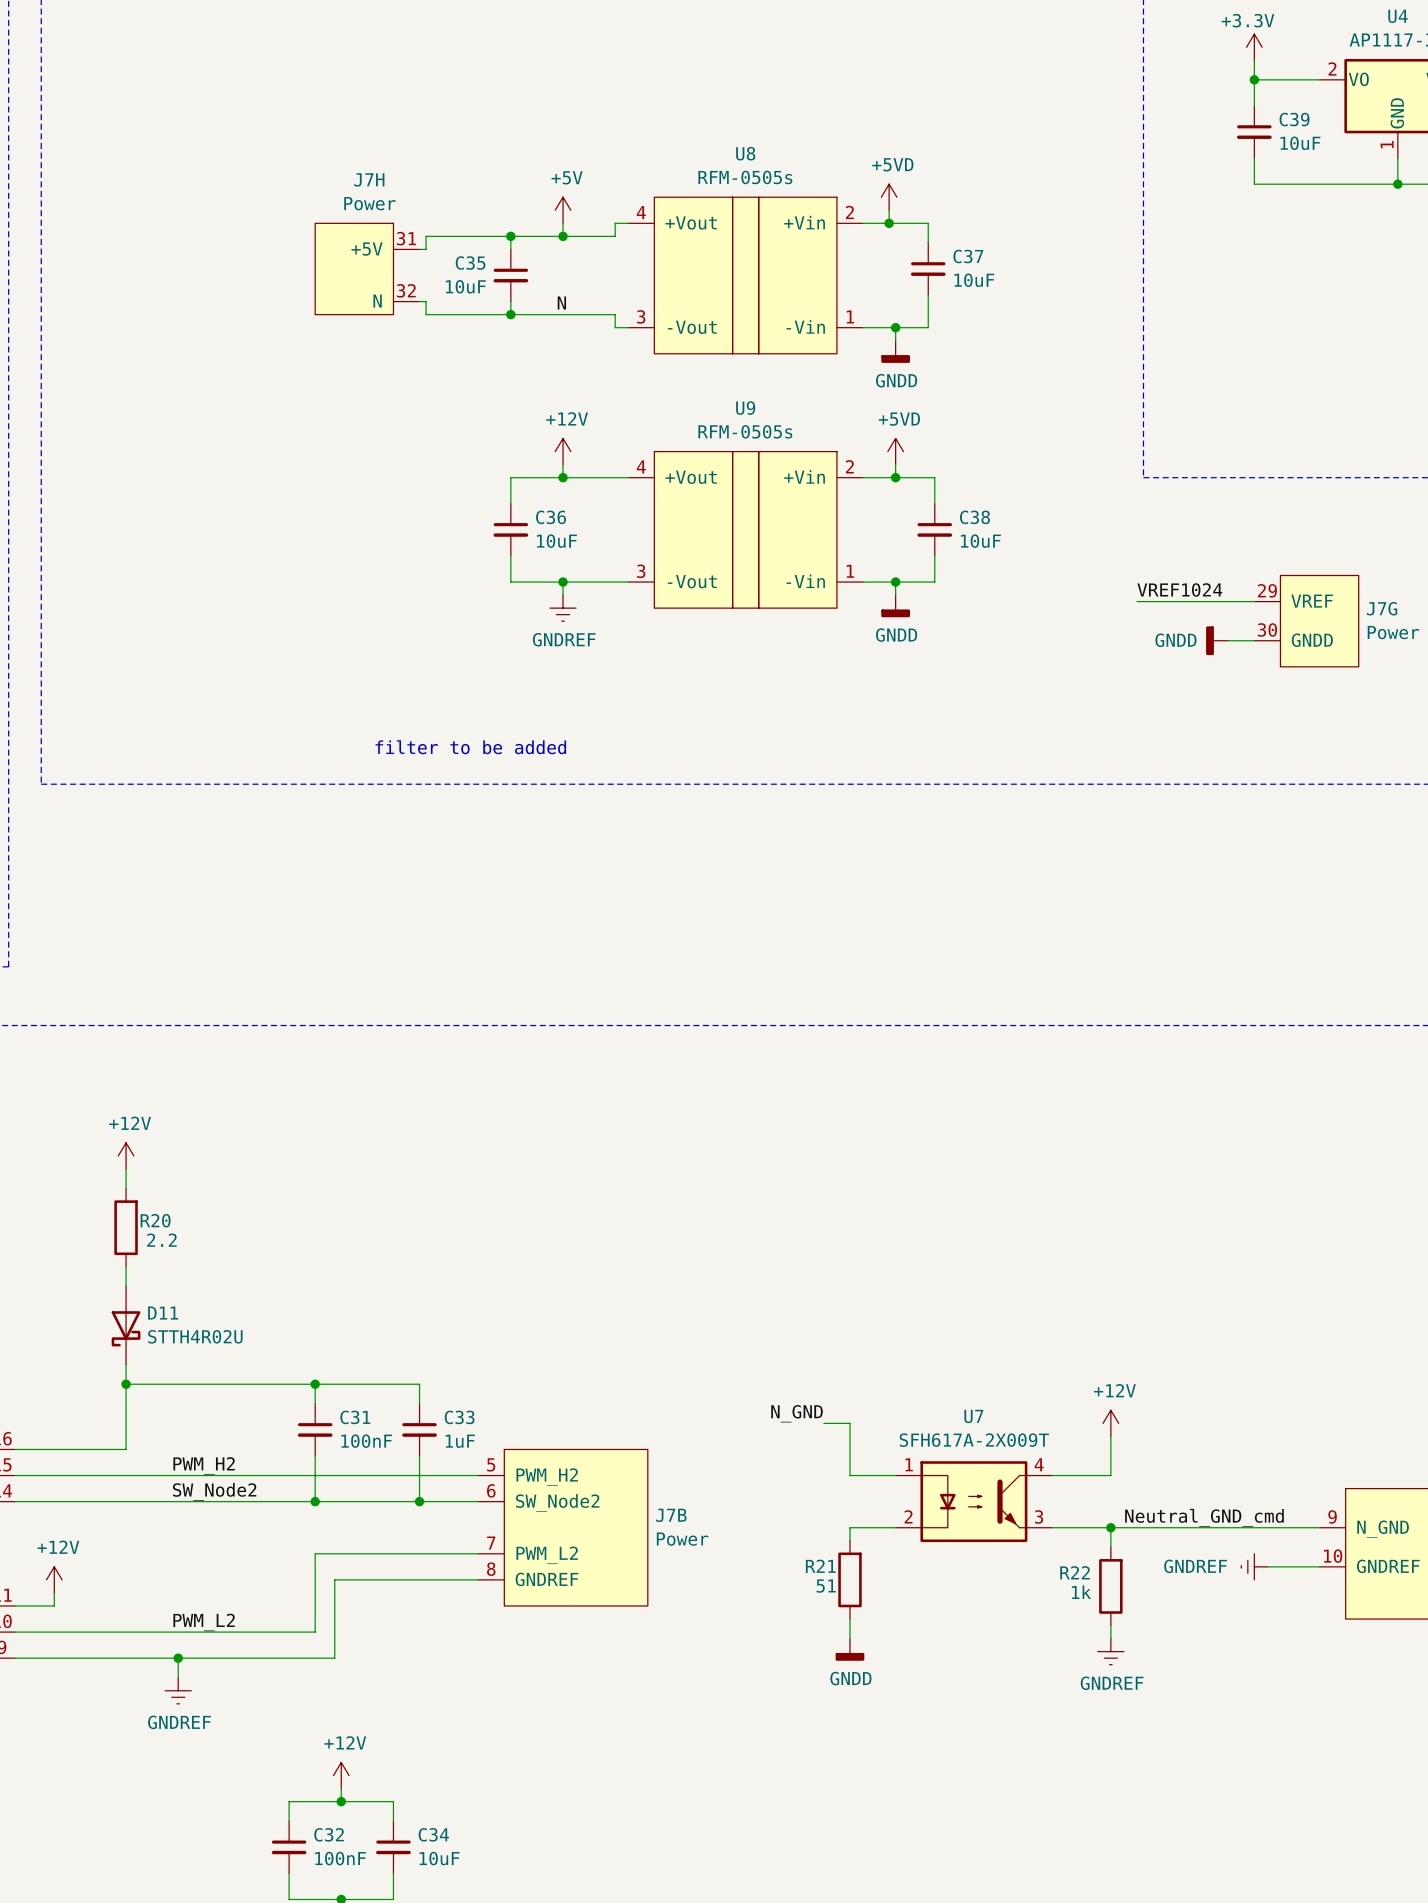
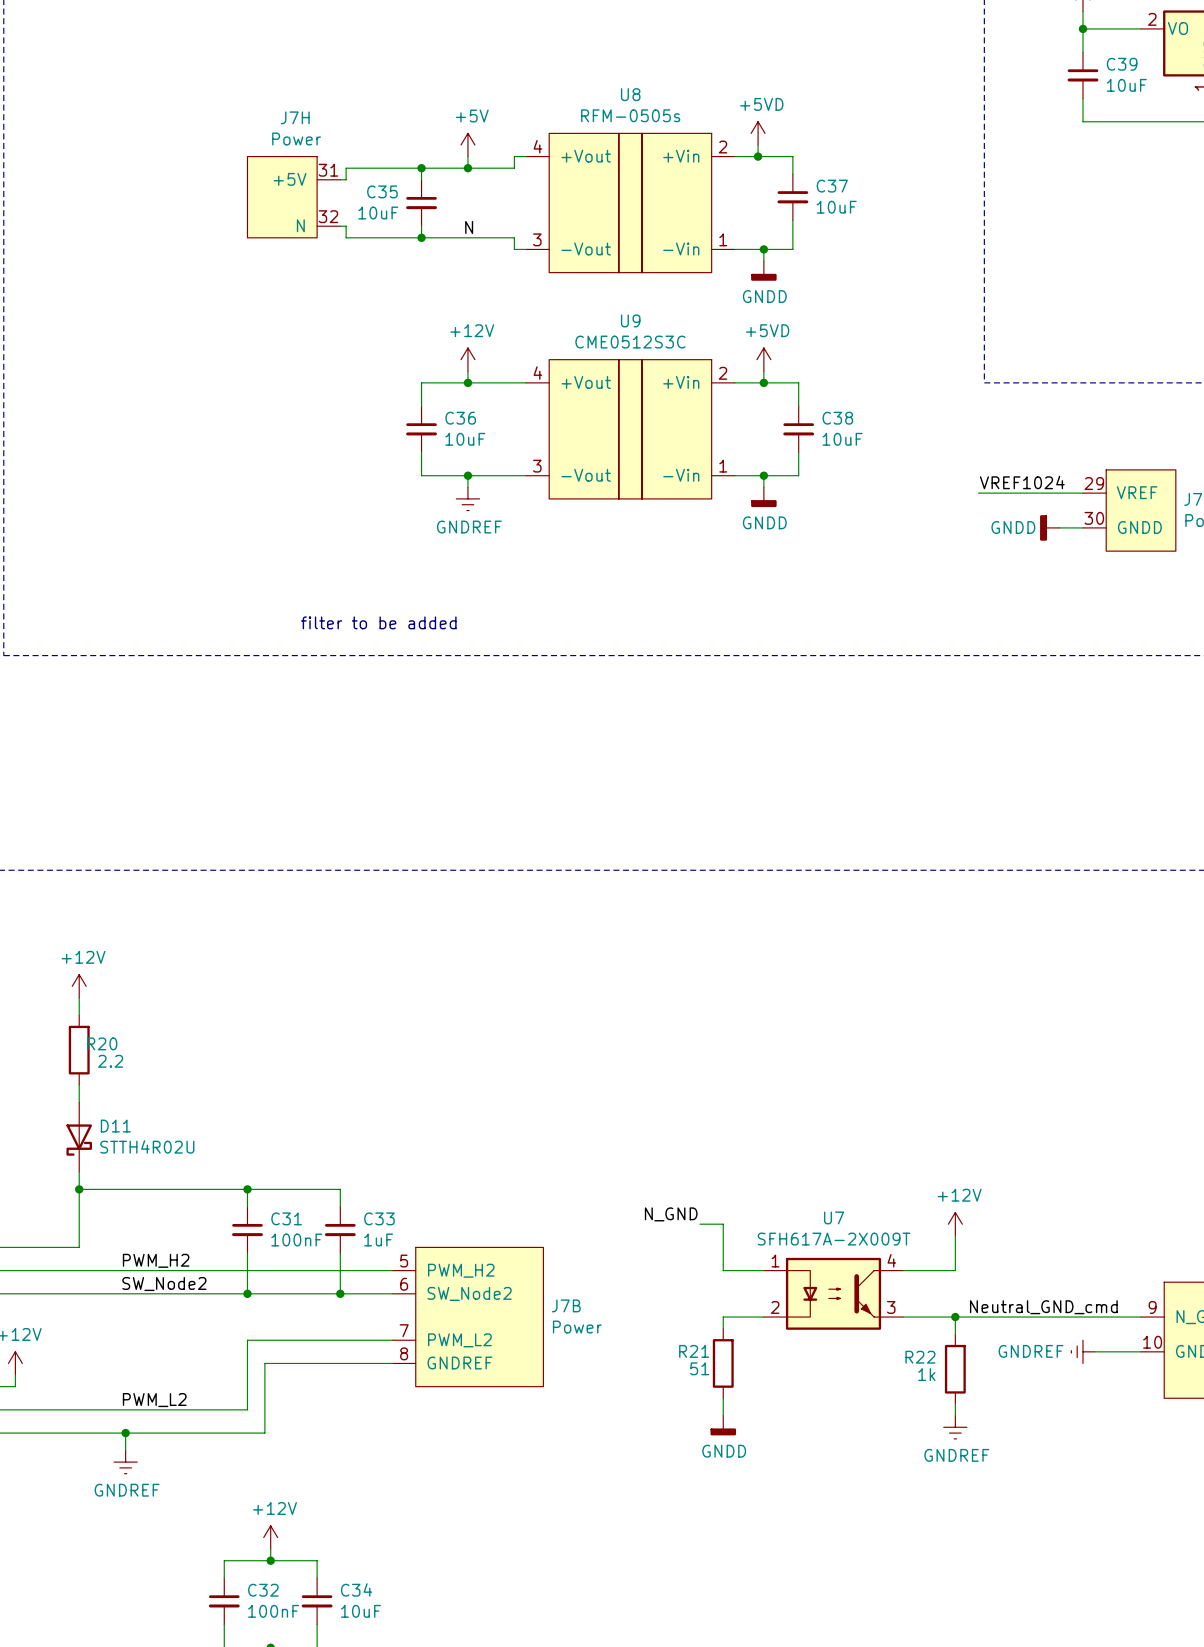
U9 value: RFM-0505s (745, 431) -> CME0512S3C (630, 342)

